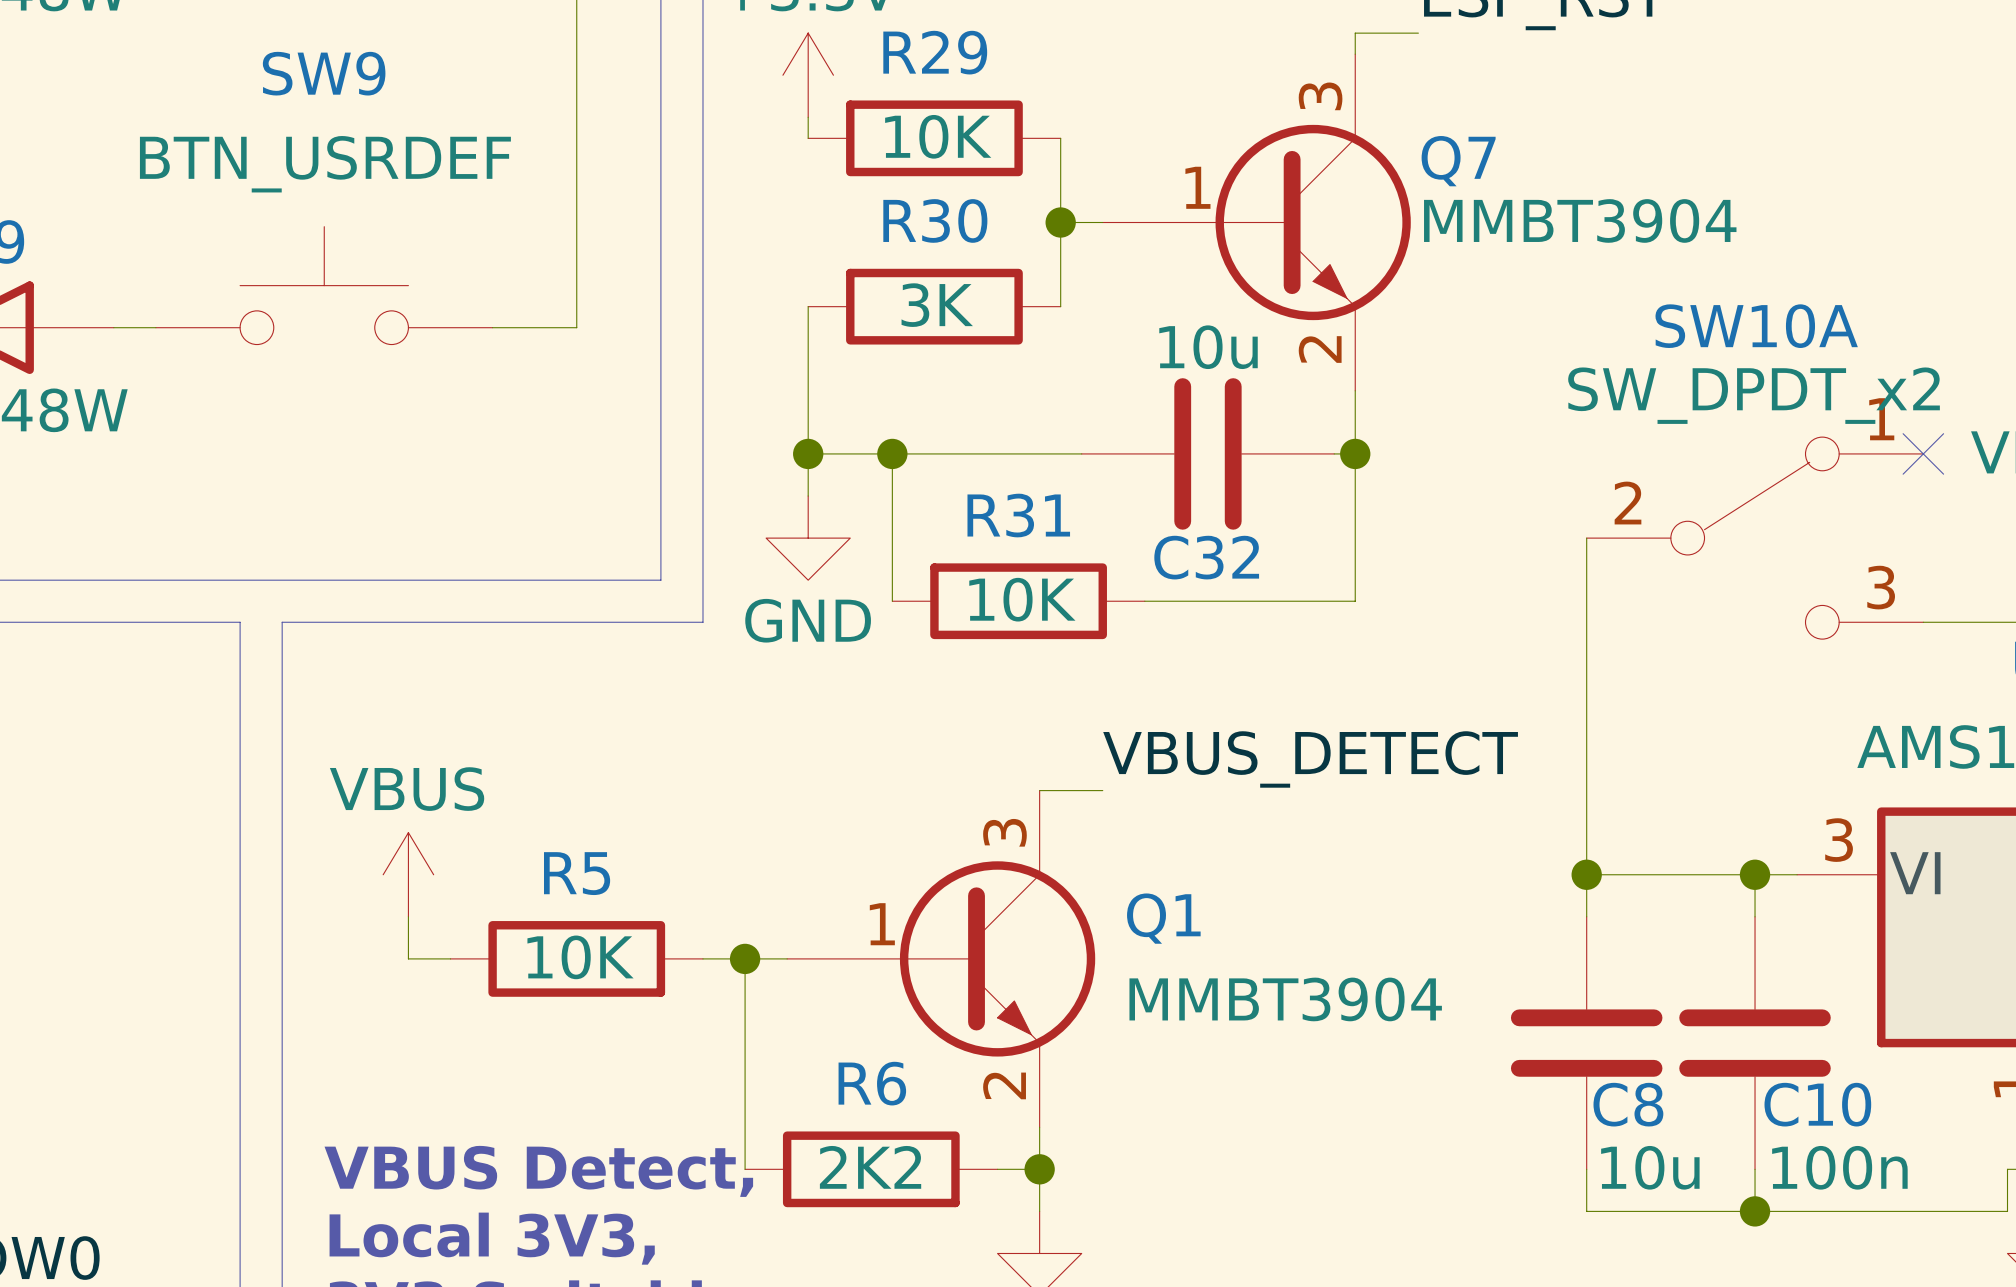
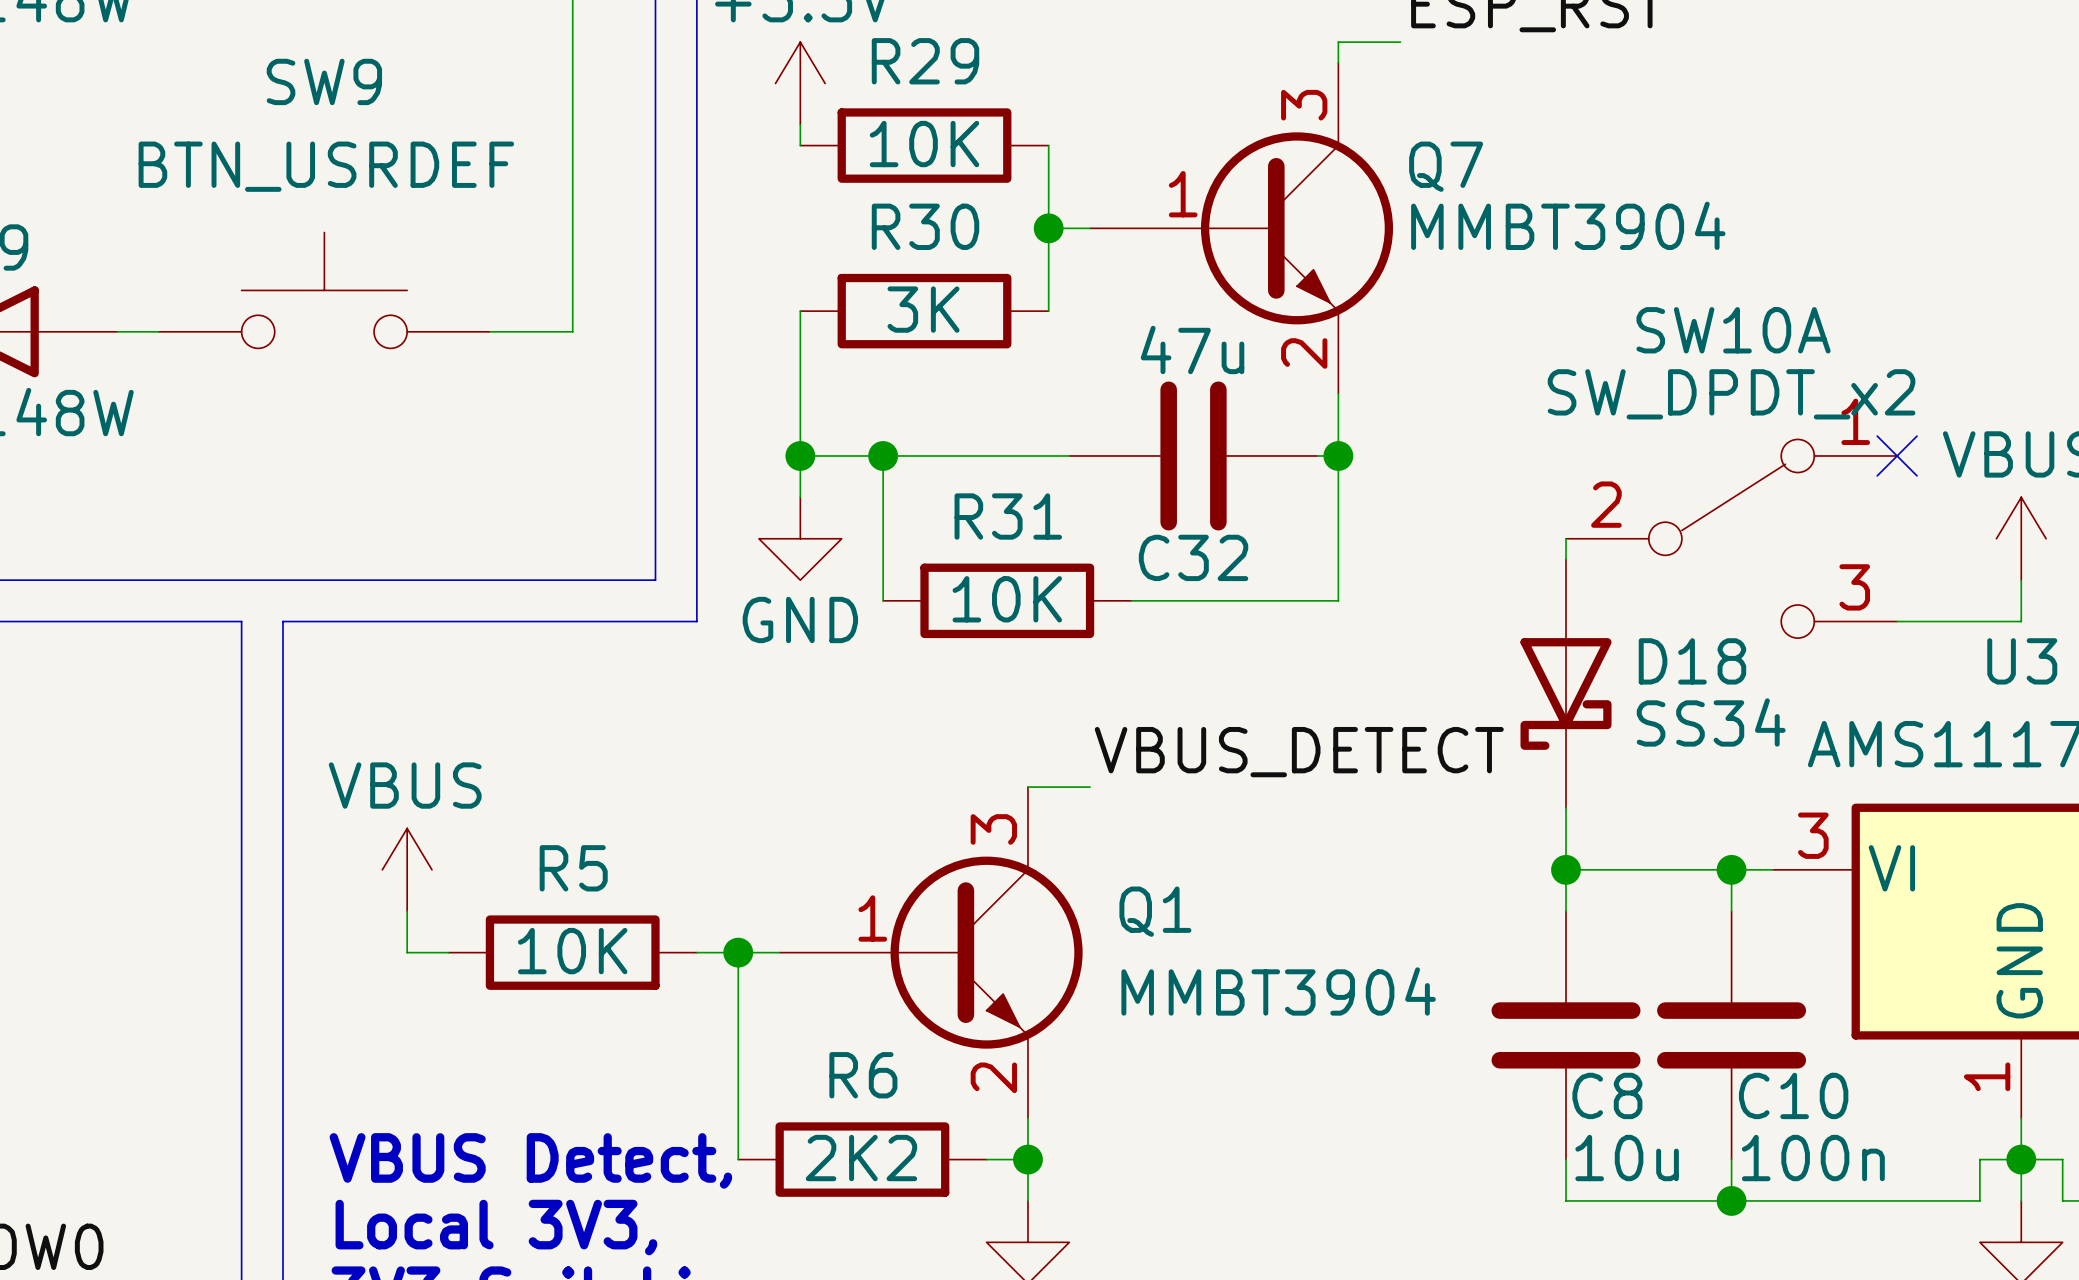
C32 value: 10u (1208, 347) -> 47u (1192, 349)
D18: none -> SS34 (1566, 683)

